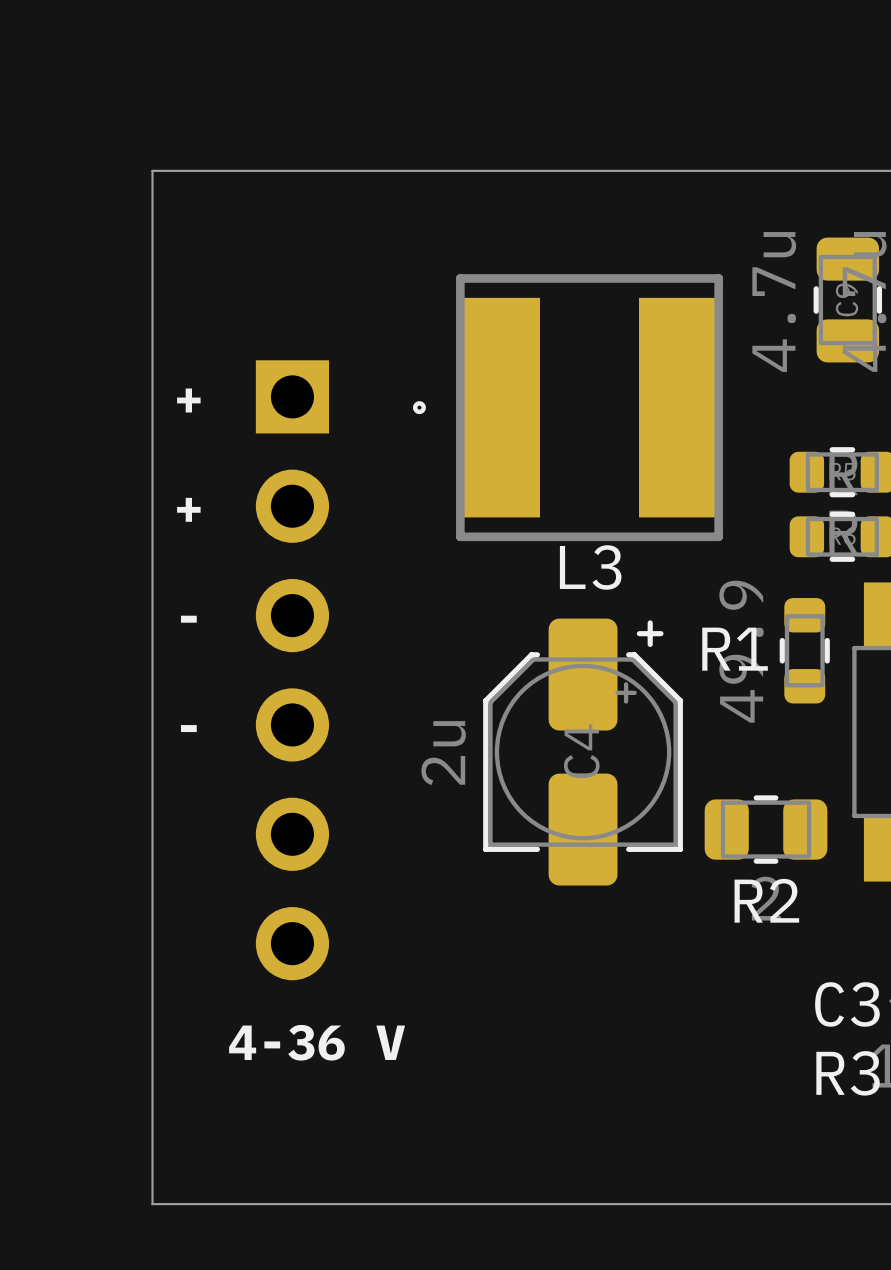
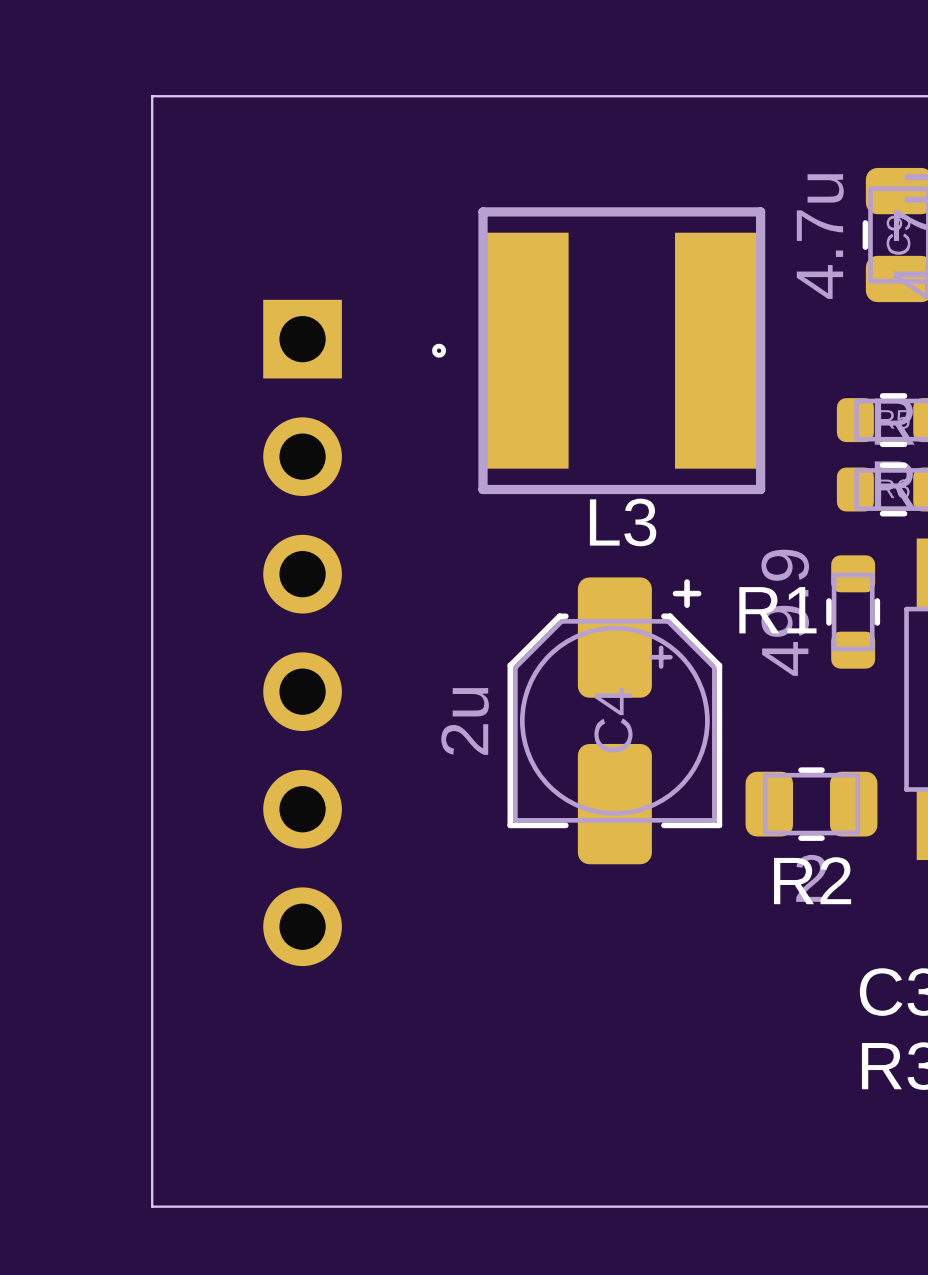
text: + (188, 400) -> none
text: + (188, 509) -> none
text: - (188, 619) -> none
text: - (188, 728) -> none
text: 4-36 V (317, 1042) -> none

